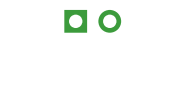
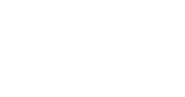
part: (92, 21) -> none

